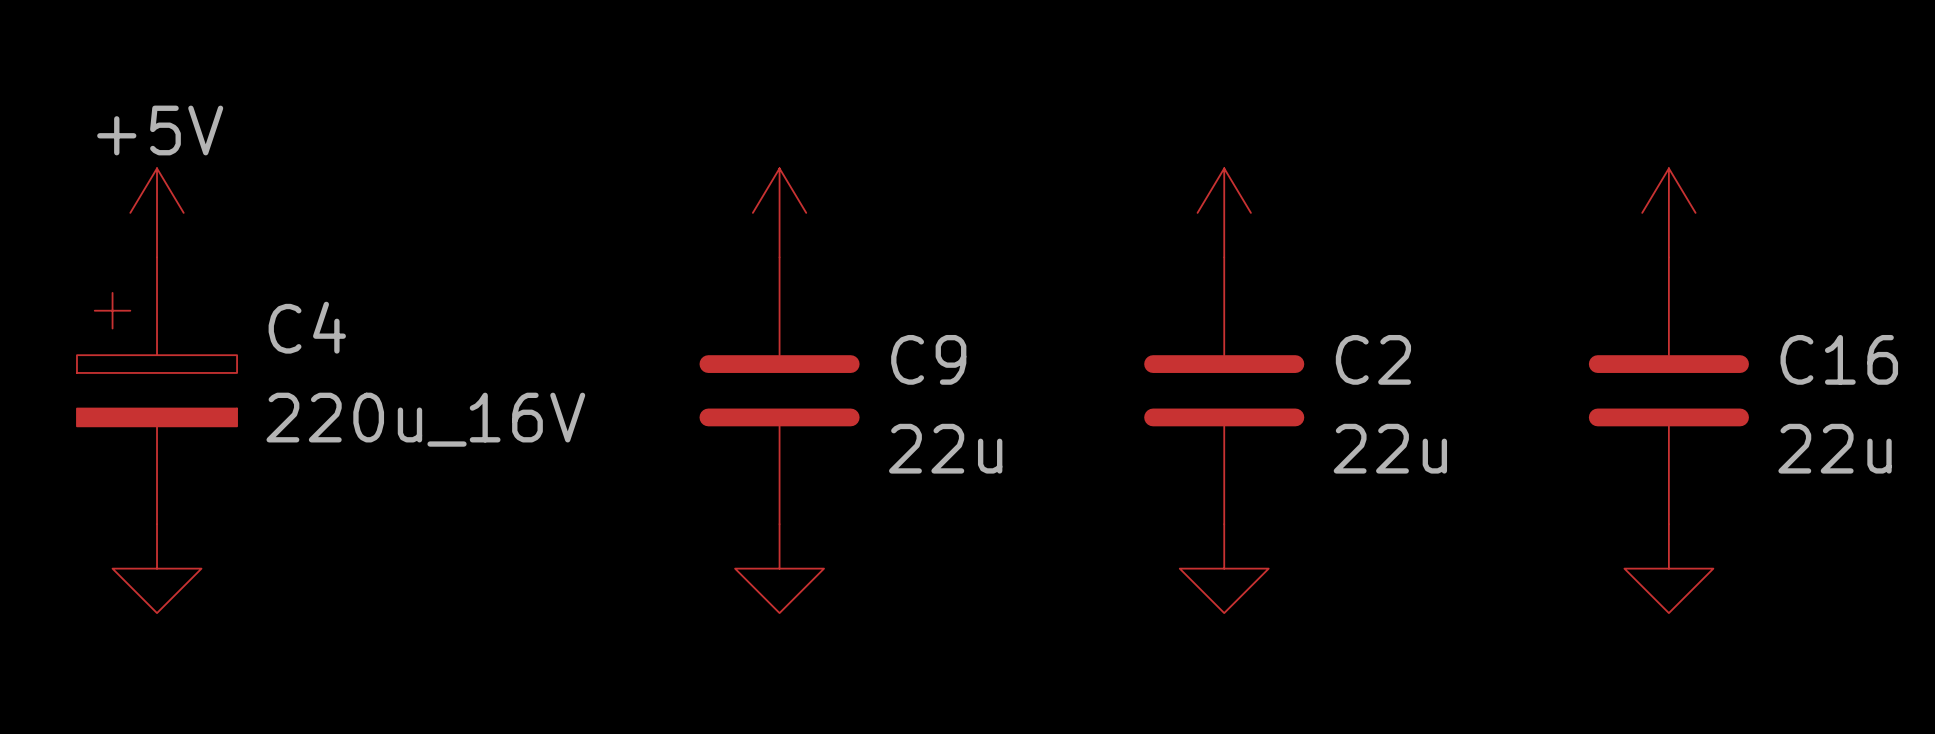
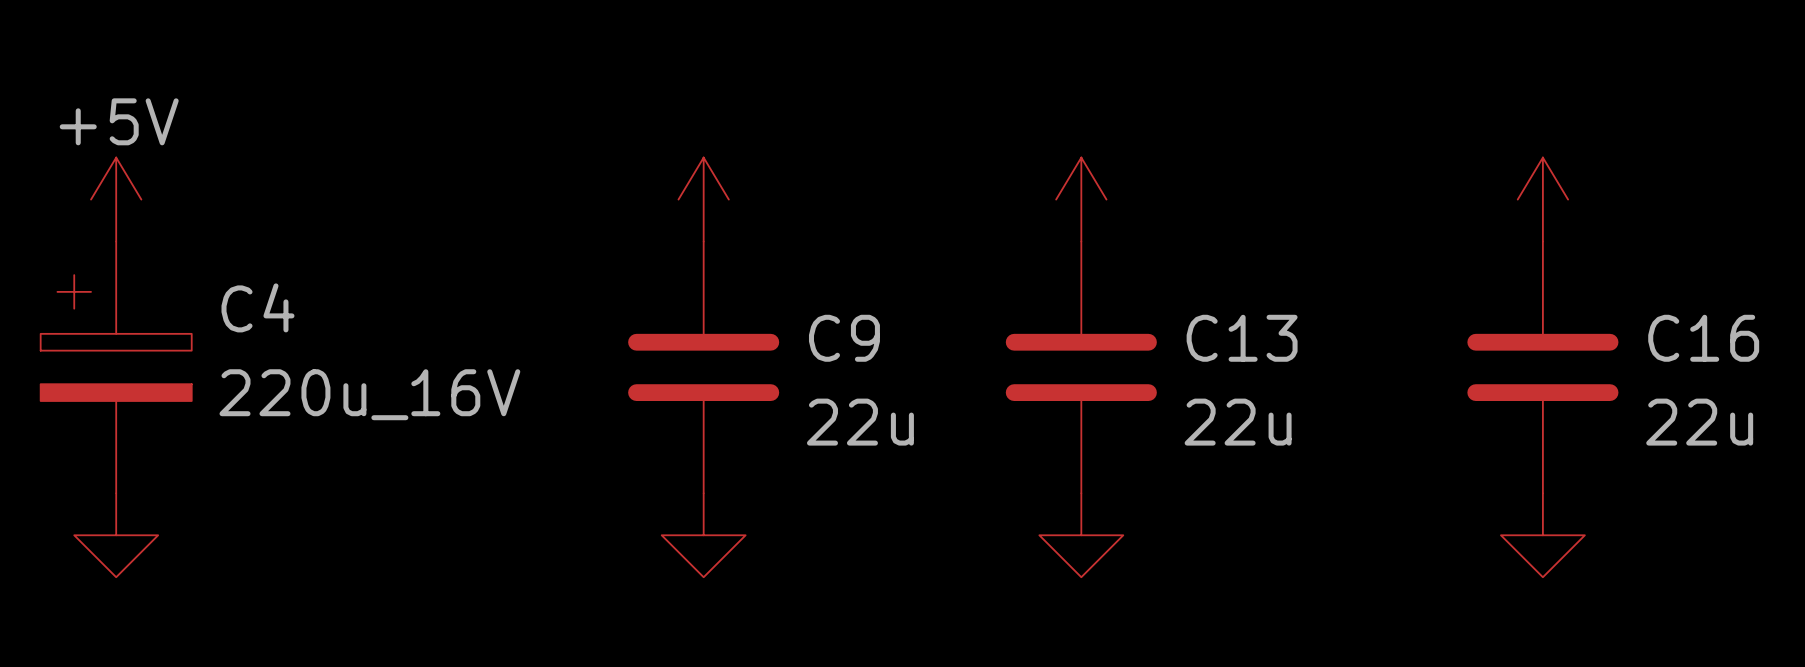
power symbol position: (1224, 212) -> (1081, 199)
C13: none -> 22u (1081, 367)
C2: 22u (1224, 390) -> none
power symbol position: (1224, 568) -> (1081, 535)

